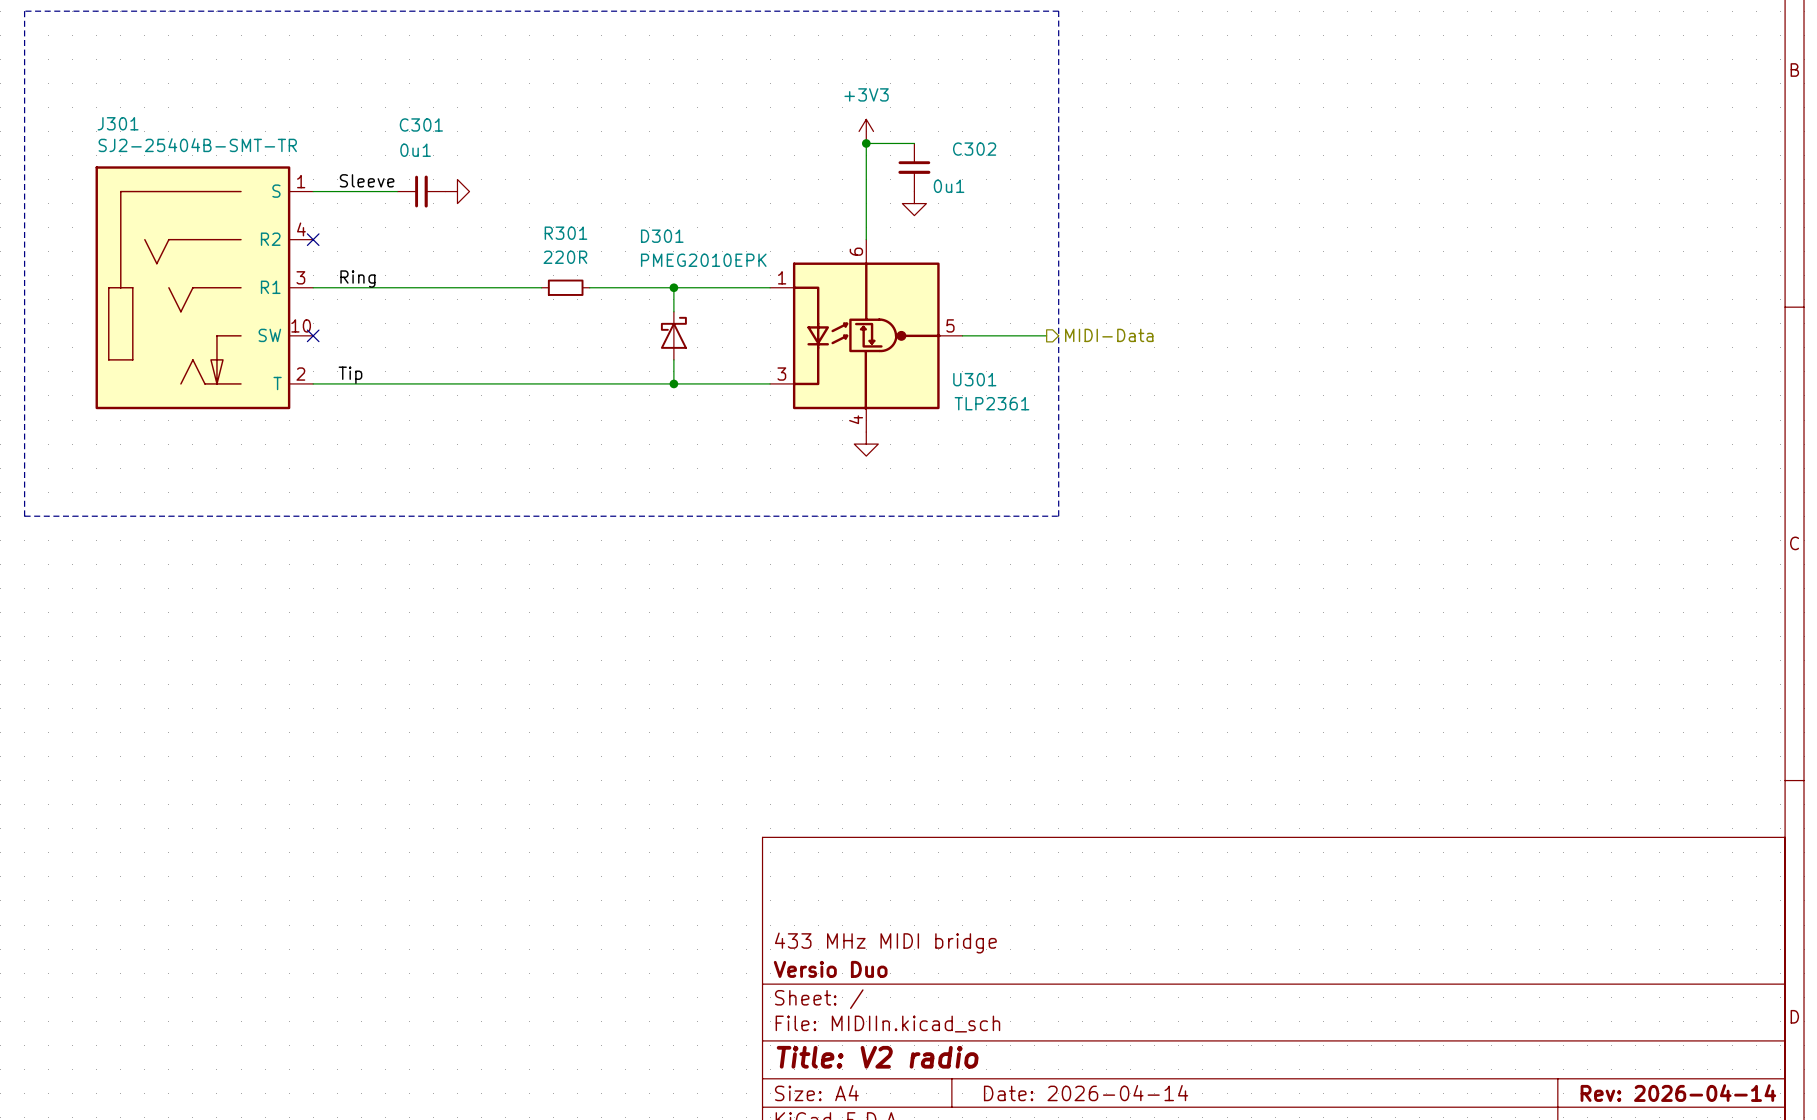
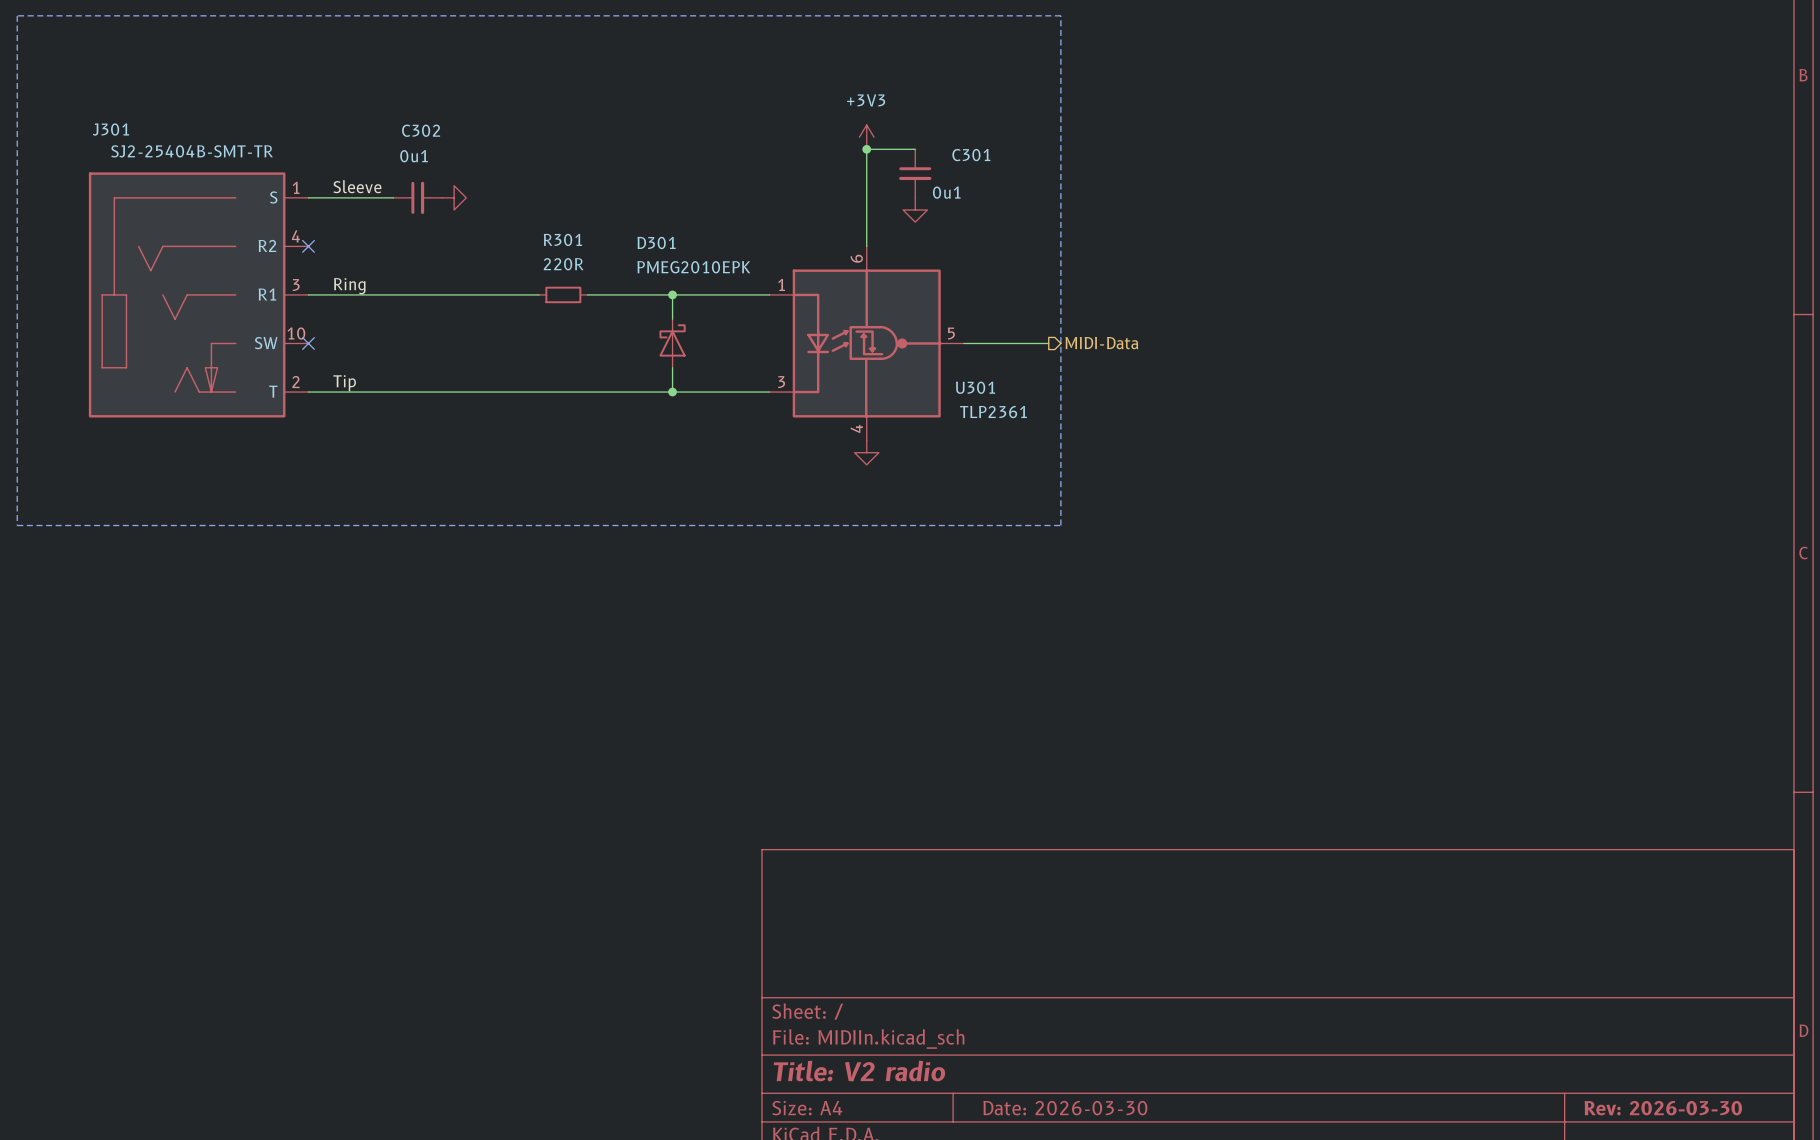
C301 name: C301 (421, 124) -> C302 (421, 130)
C302 name: C302 (974, 149) -> C301 (971, 155)
title block: 433 MHz MIDI bridge (885, 943) -> none
title block: Versio Duo (830, 969) -> none
title block: Date: 2026-04-14 (1086, 1093) -> Date: 2026-03-30 (1065, 1108)
title block: Rev: 2026-04-14 (1678, 1093) -> Rev: 2026-03-30 (1663, 1108)

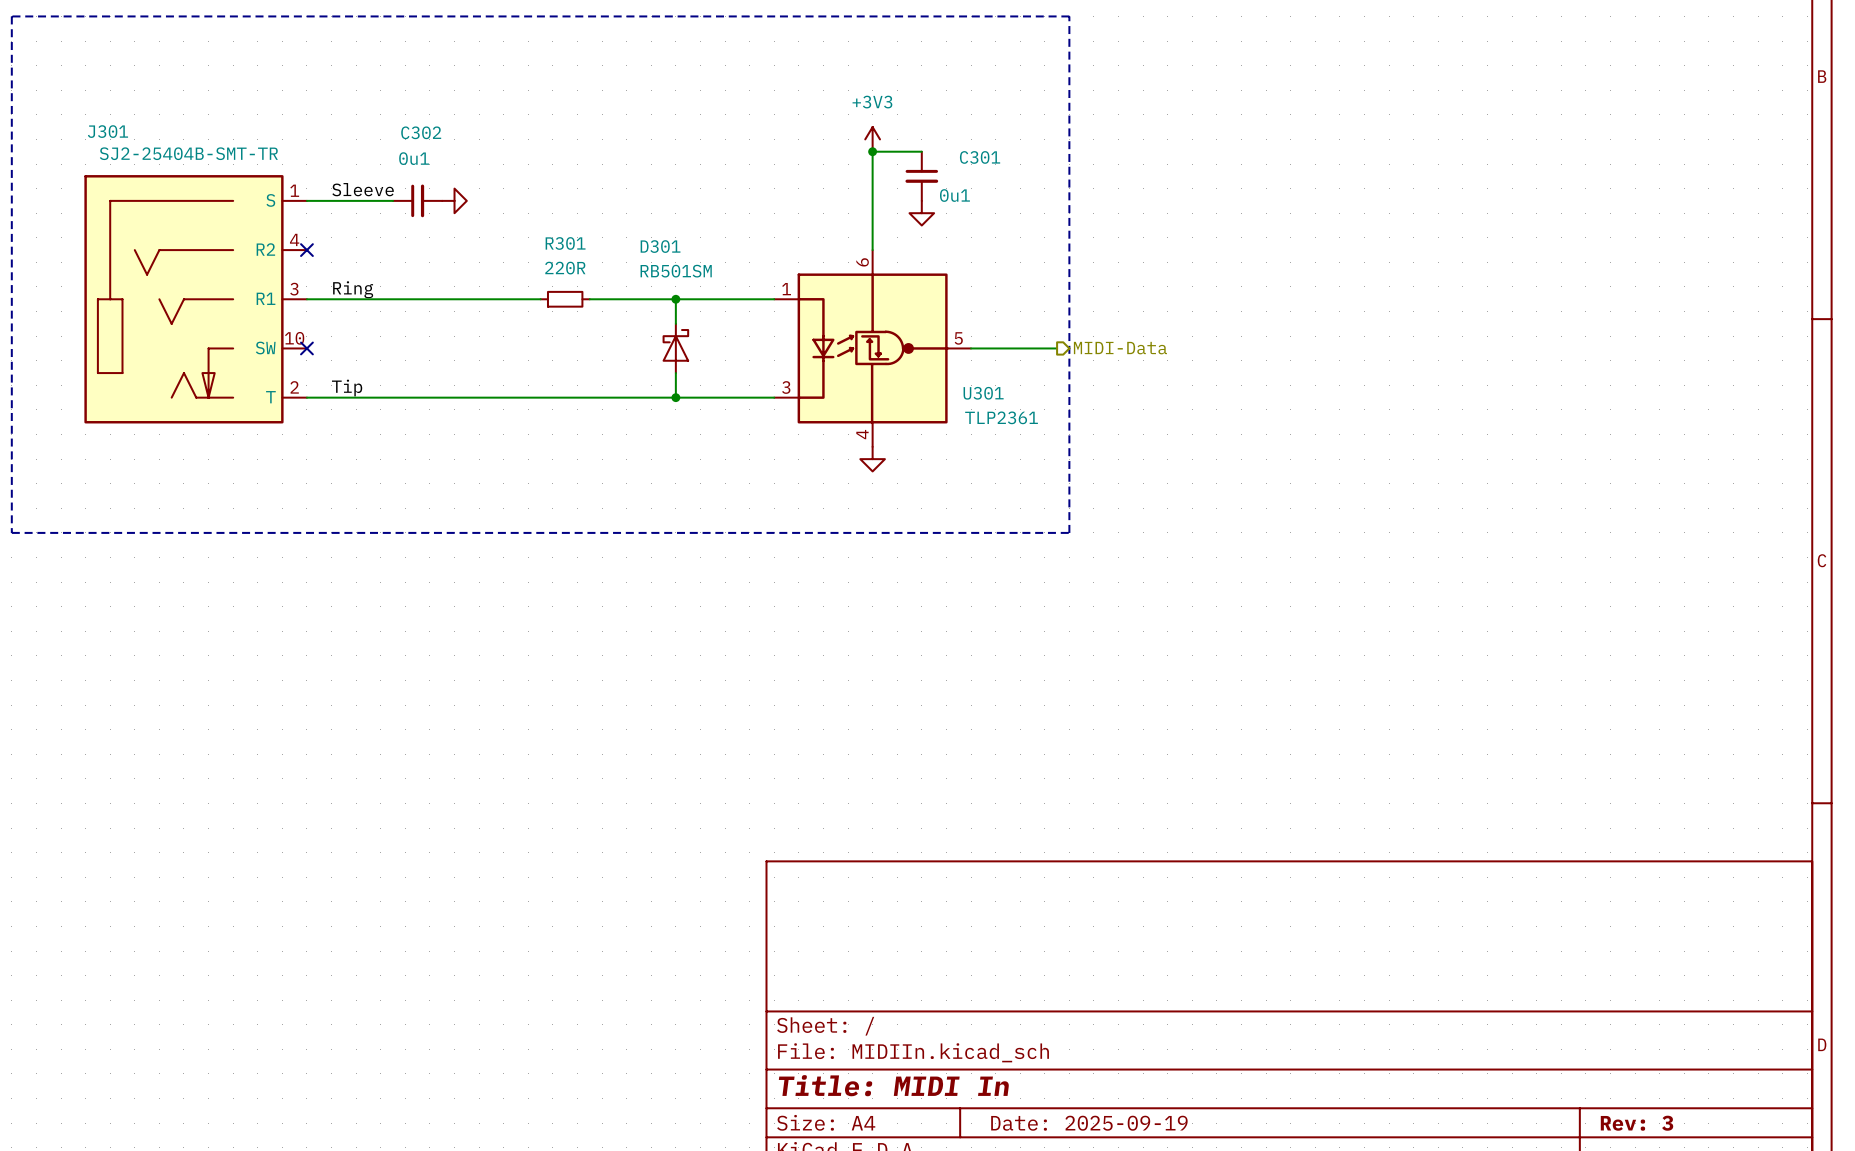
D301 value: PMEG2010EPK (693, 267) -> RB501SM (676, 271)
title block: Title: V2 radio (859, 1071) -> Title: MIDI In (893, 1085)
title block: Date: 2026-03-30 (1065, 1108) -> Date: 2025-09-19 (1089, 1123)
title block: Rev: 2026-03-30 (1663, 1108) -> Rev: 3 (1636, 1123)

